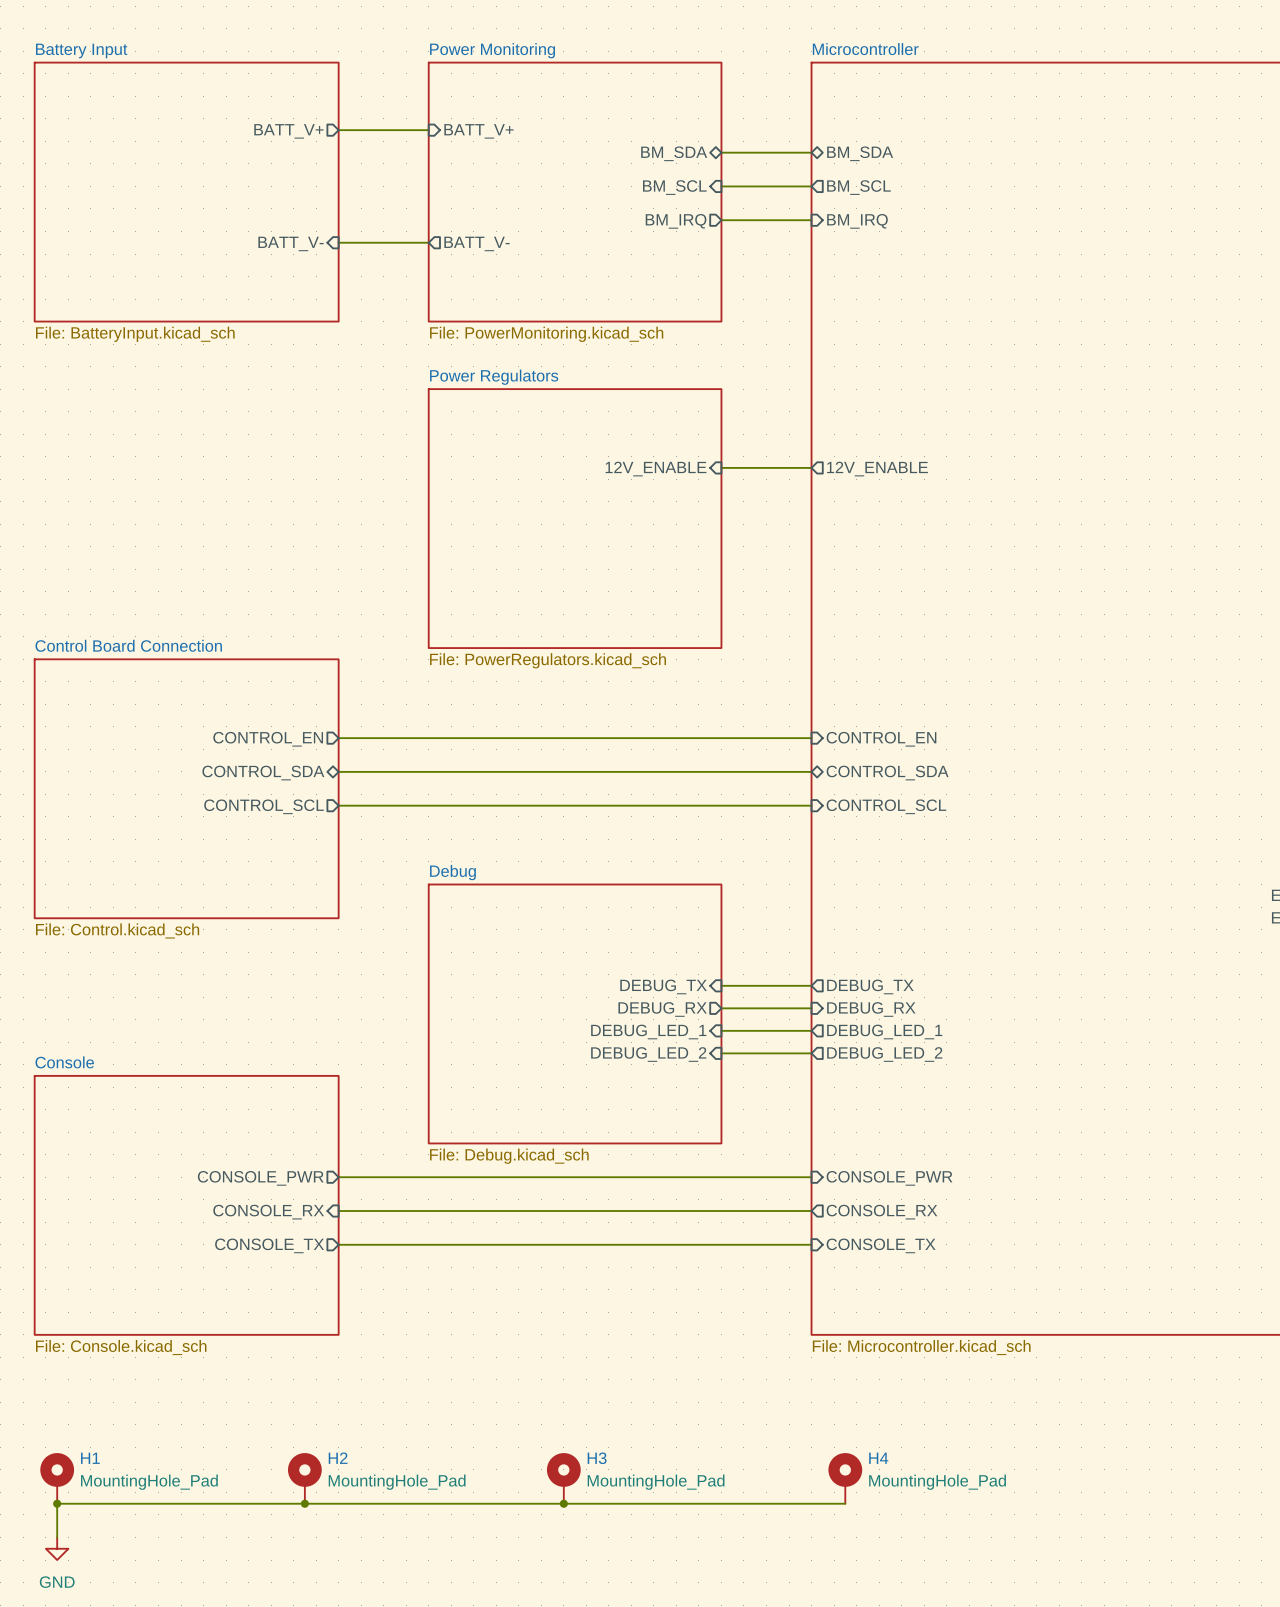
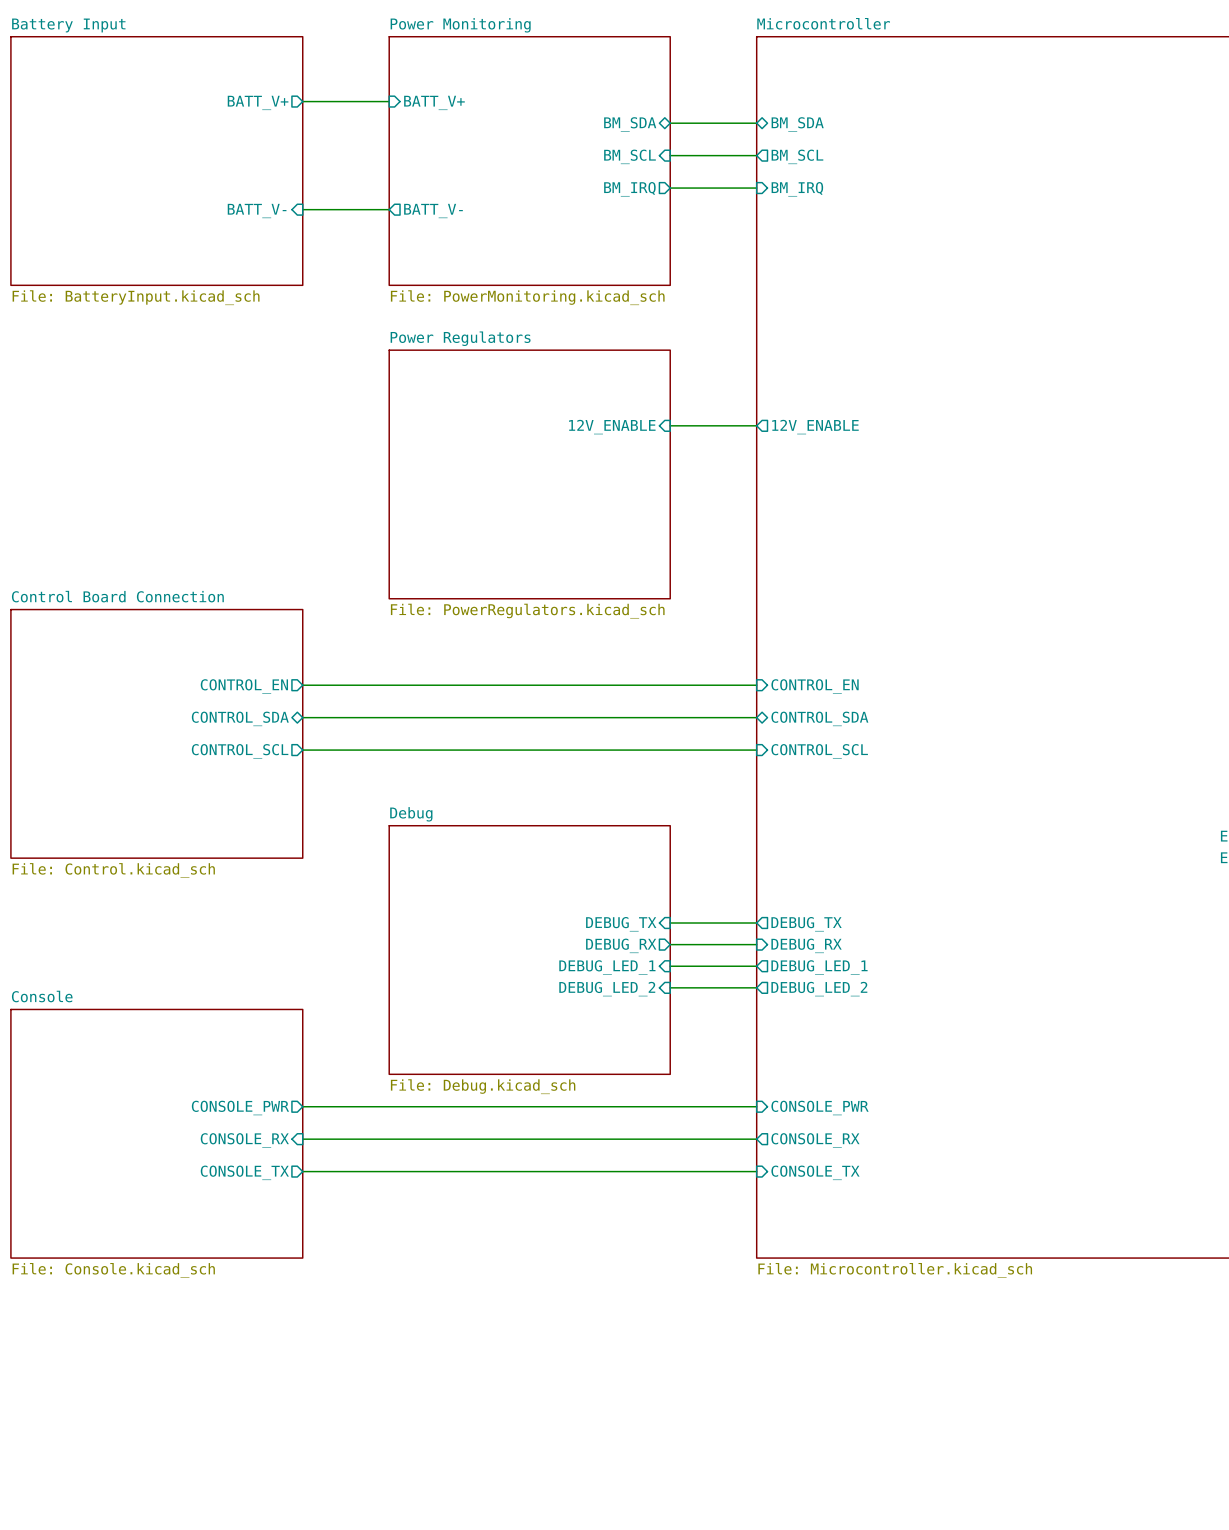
H1: MountingHole_Pad (57, 1478) -> none
H2: MountingHole_Pad (304, 1478) -> none
H3: MountingHole_Pad (563, 1478) -> none
H4: MountingHole_Pad (845, 1478) -> none
junction: (57, 1503) -> none
junction: (304, 1503) -> none
junction: (563, 1503) -> none
wire: (845, 1503) (57, 1503) (57, 1537) -> none
power symbol: GND (57, 1548) -> none

